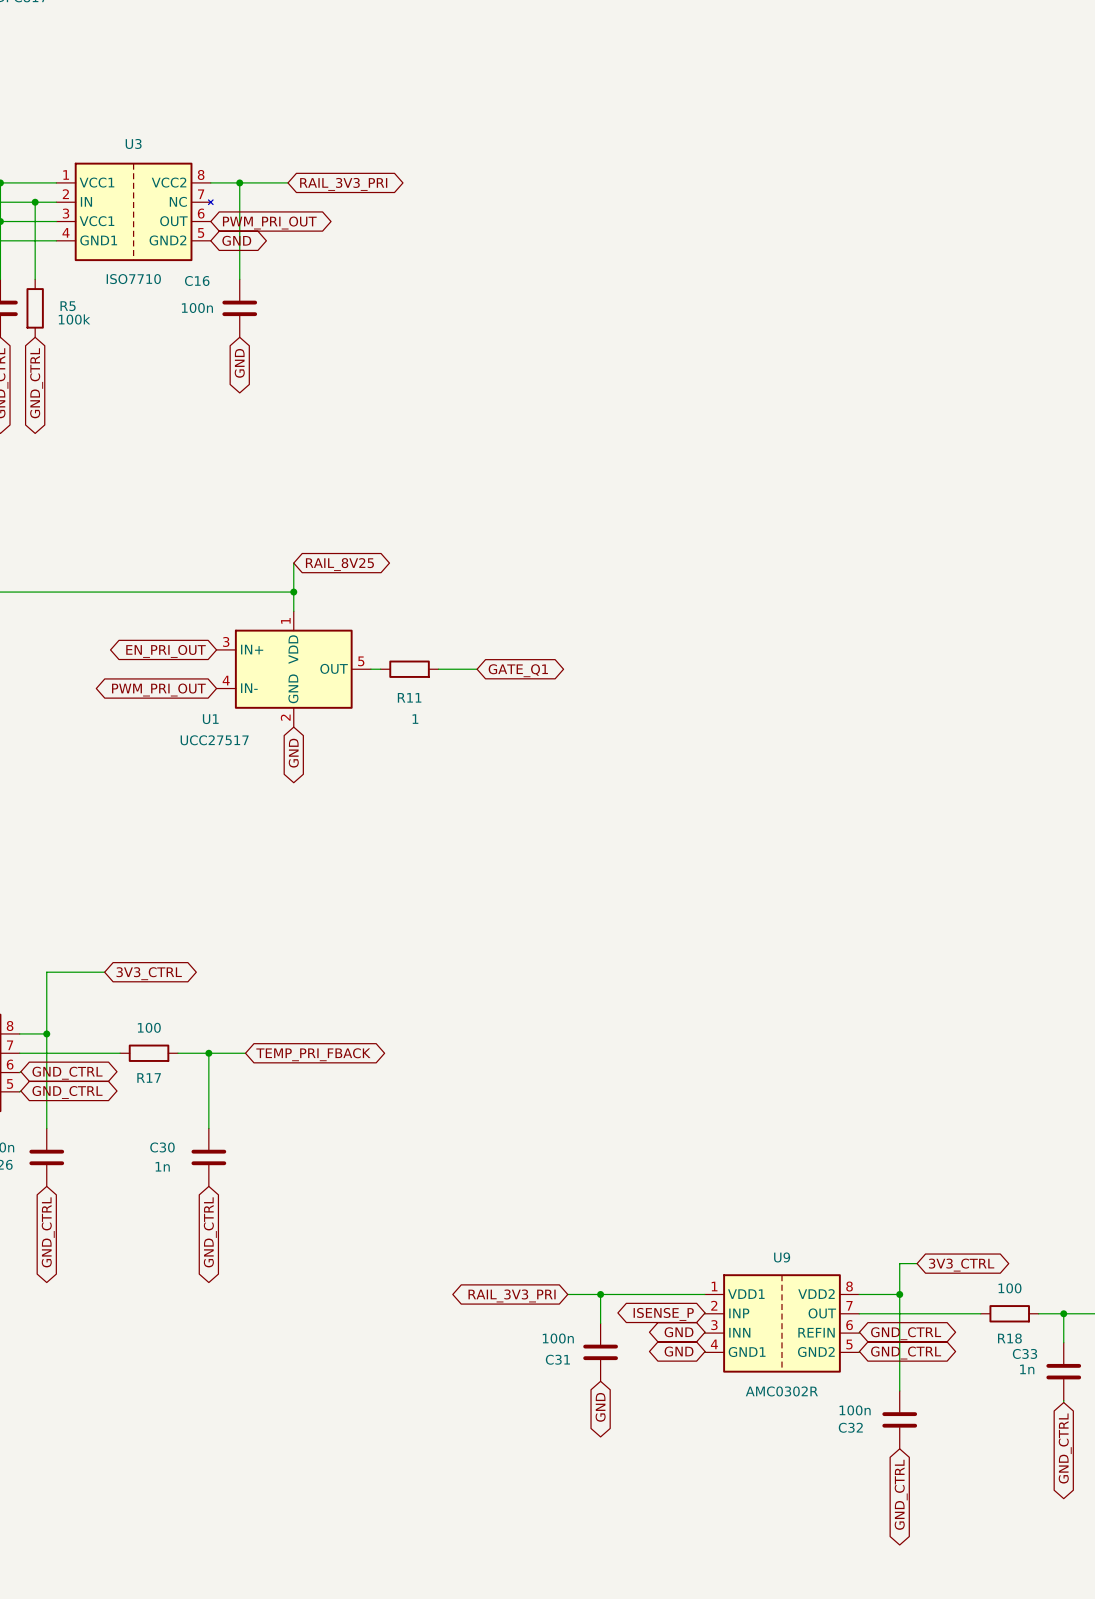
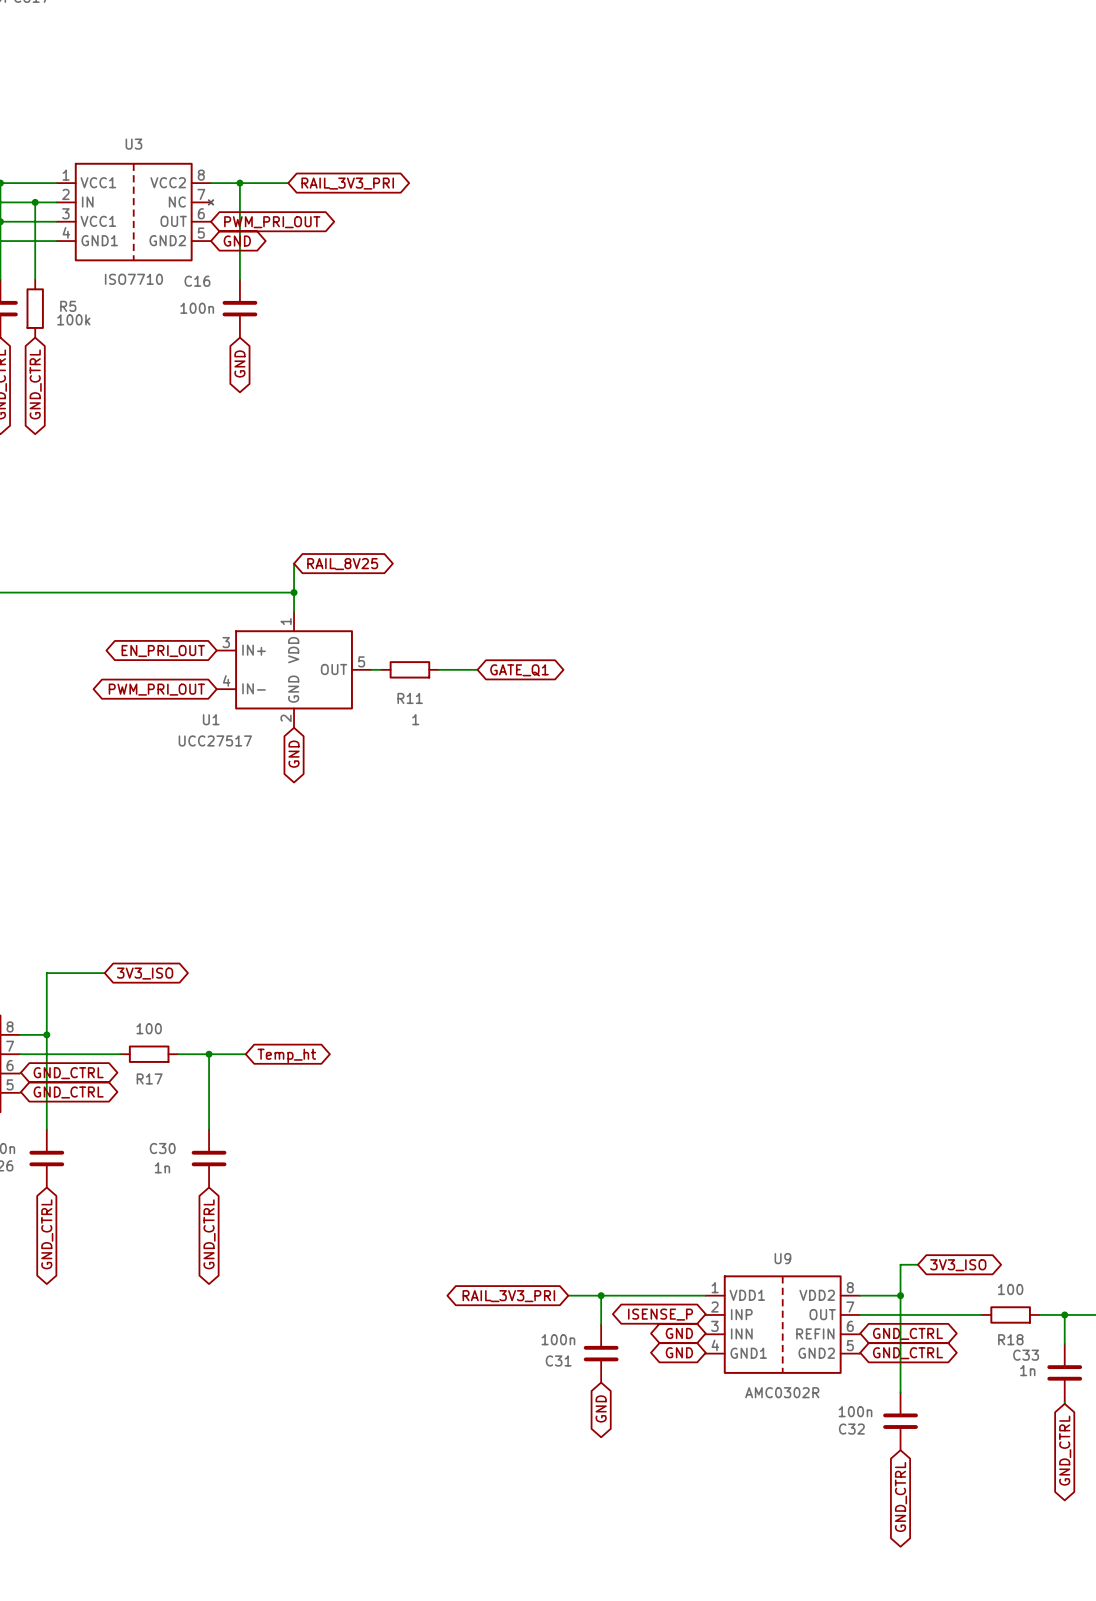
global label: 3V3_CTRL (149, 973) -> 3V3_ISO (145, 973)
global label: TEMP_PRI_FBACK (313, 1054) -> Temp_ht (286, 1055)
global label: 3V3_CTRL (961, 1265) -> 3V3_ISO (958, 1265)

